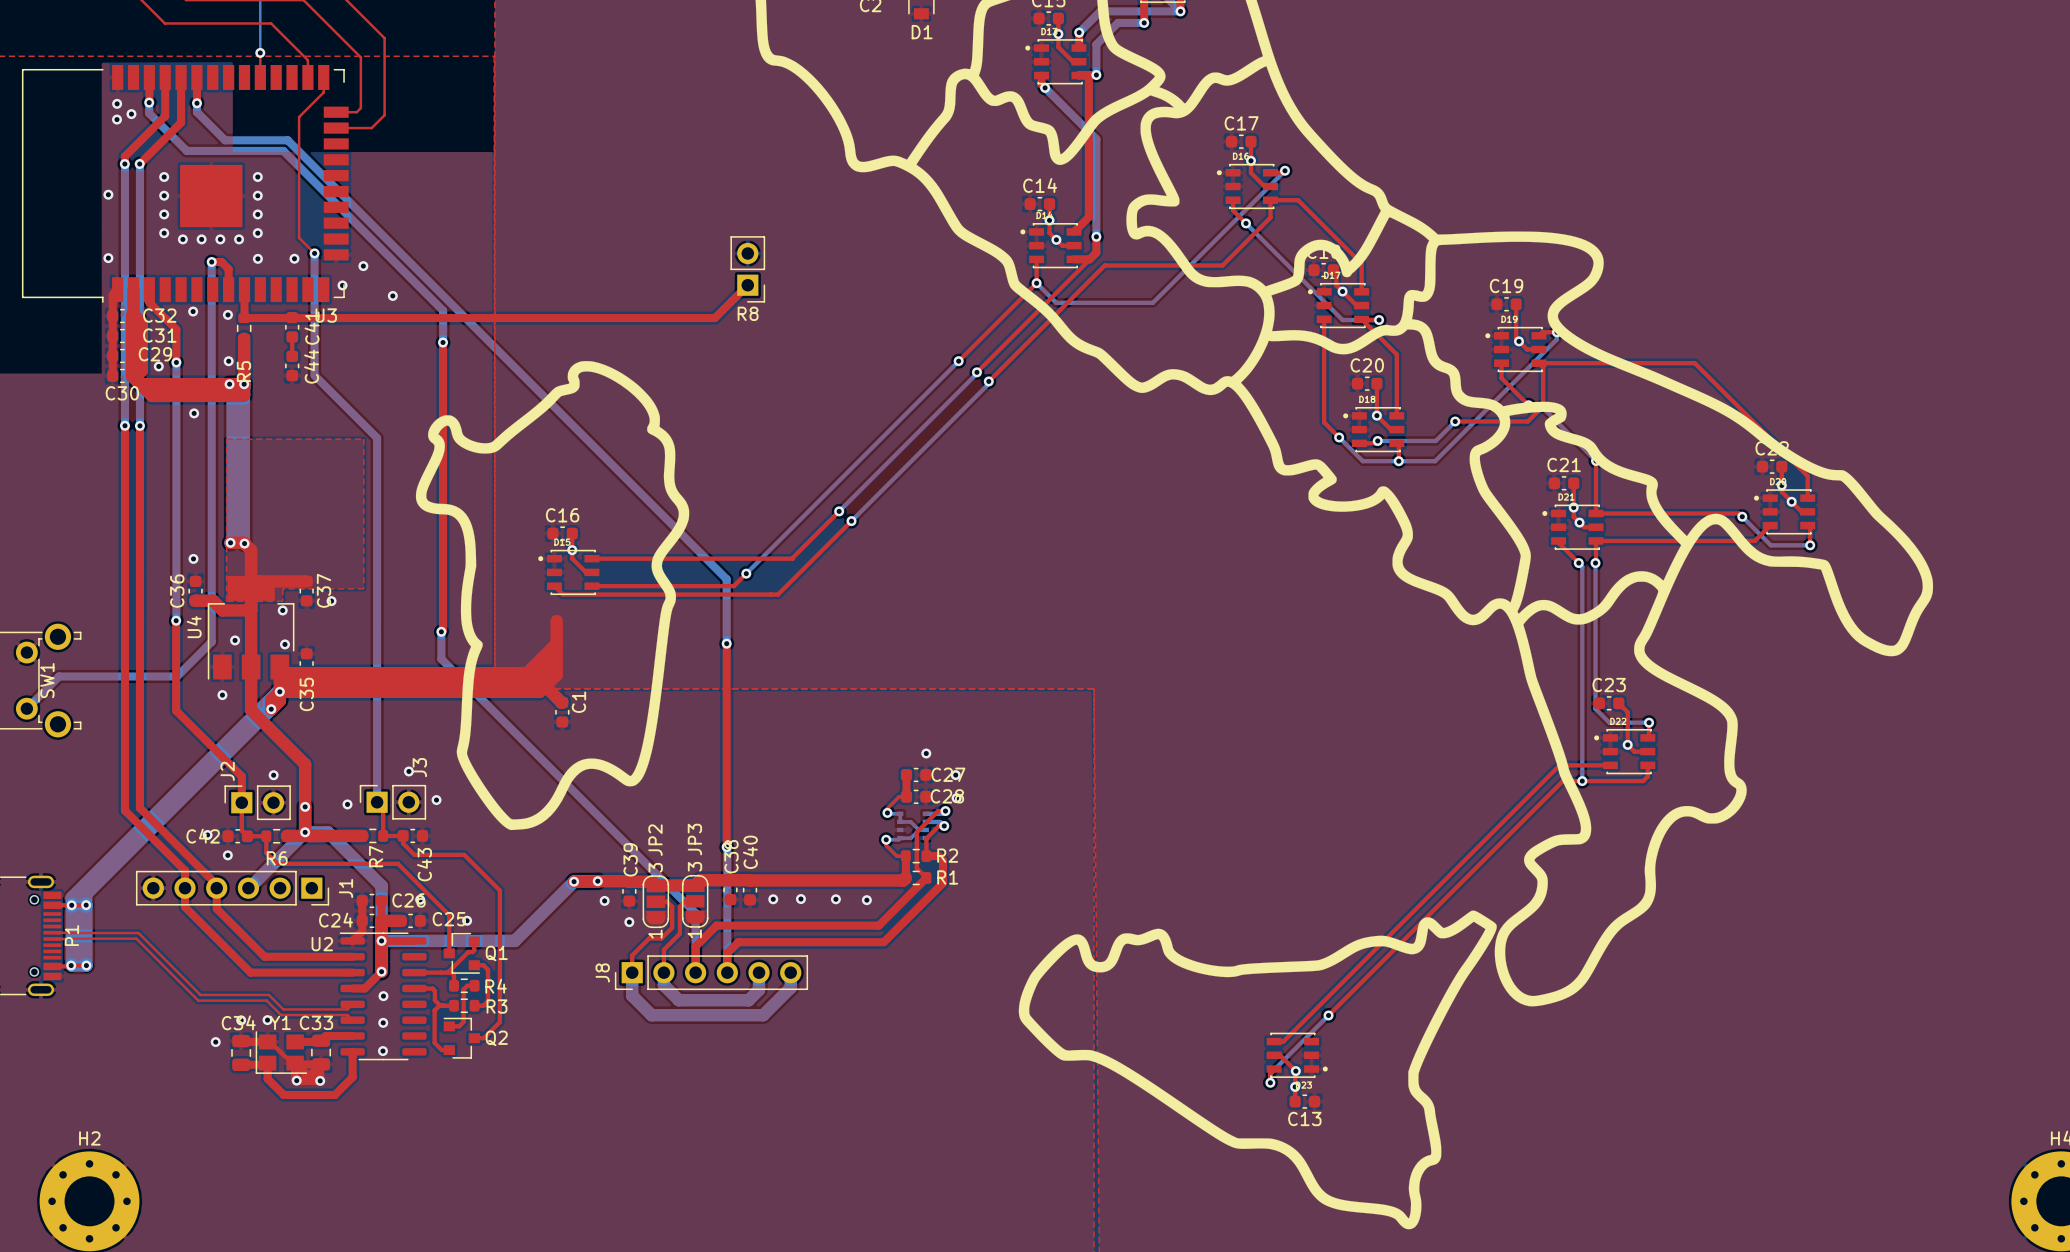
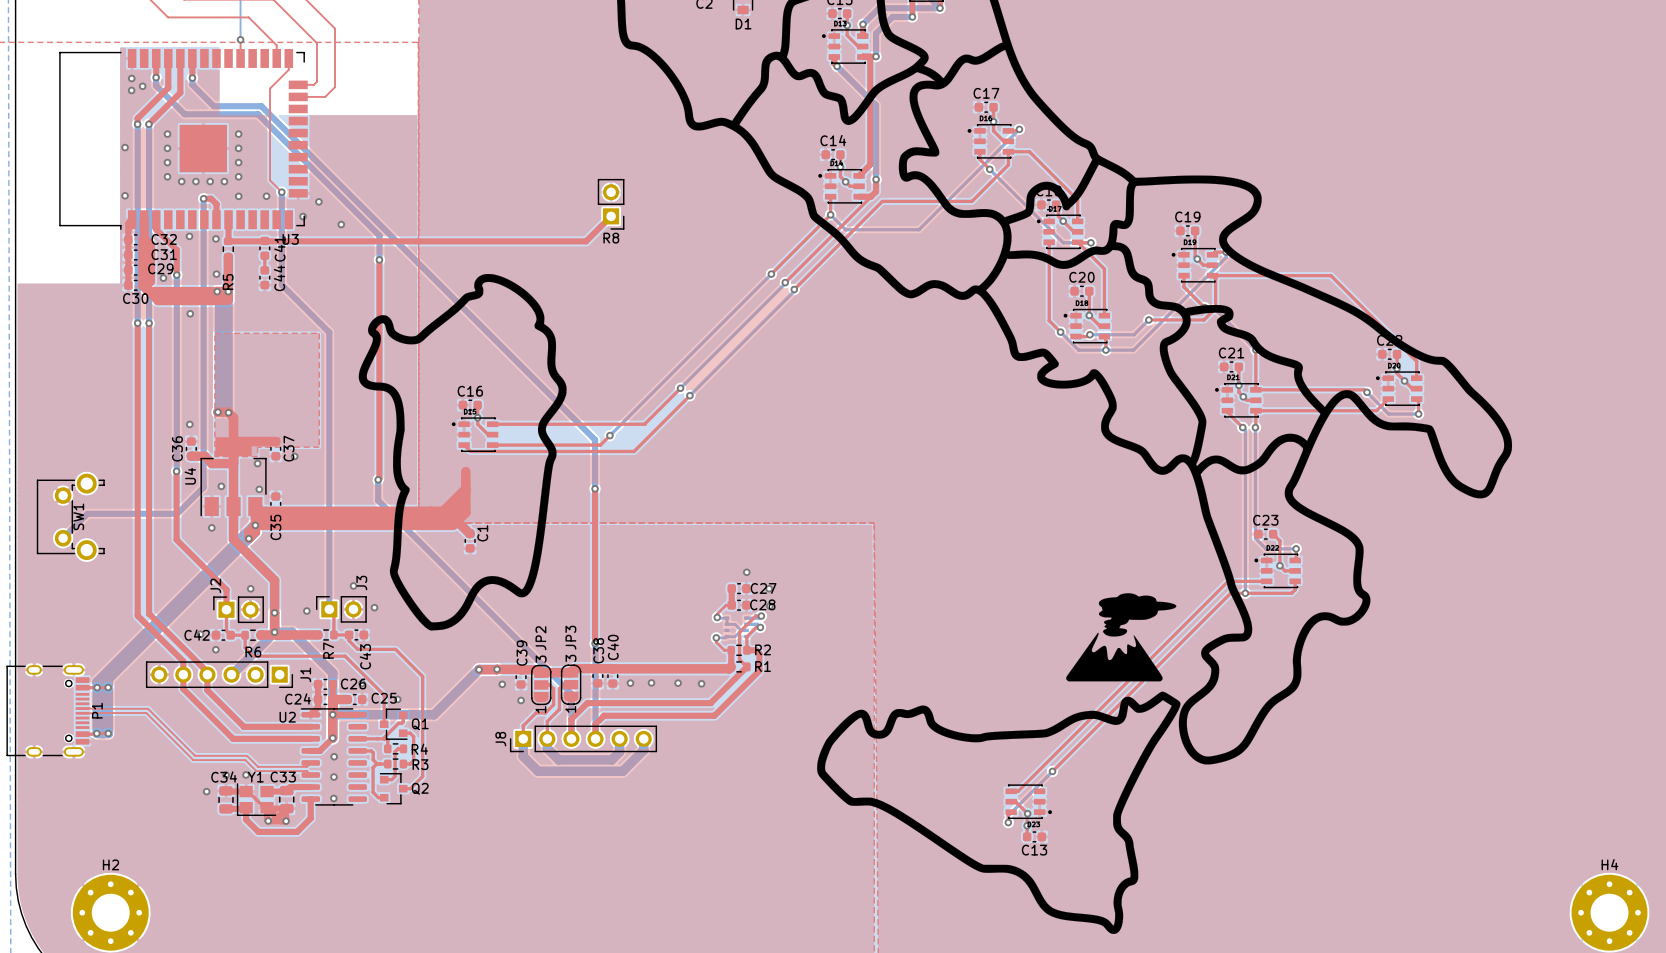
drawing: none -> [1066, 593, 1177, 682]

